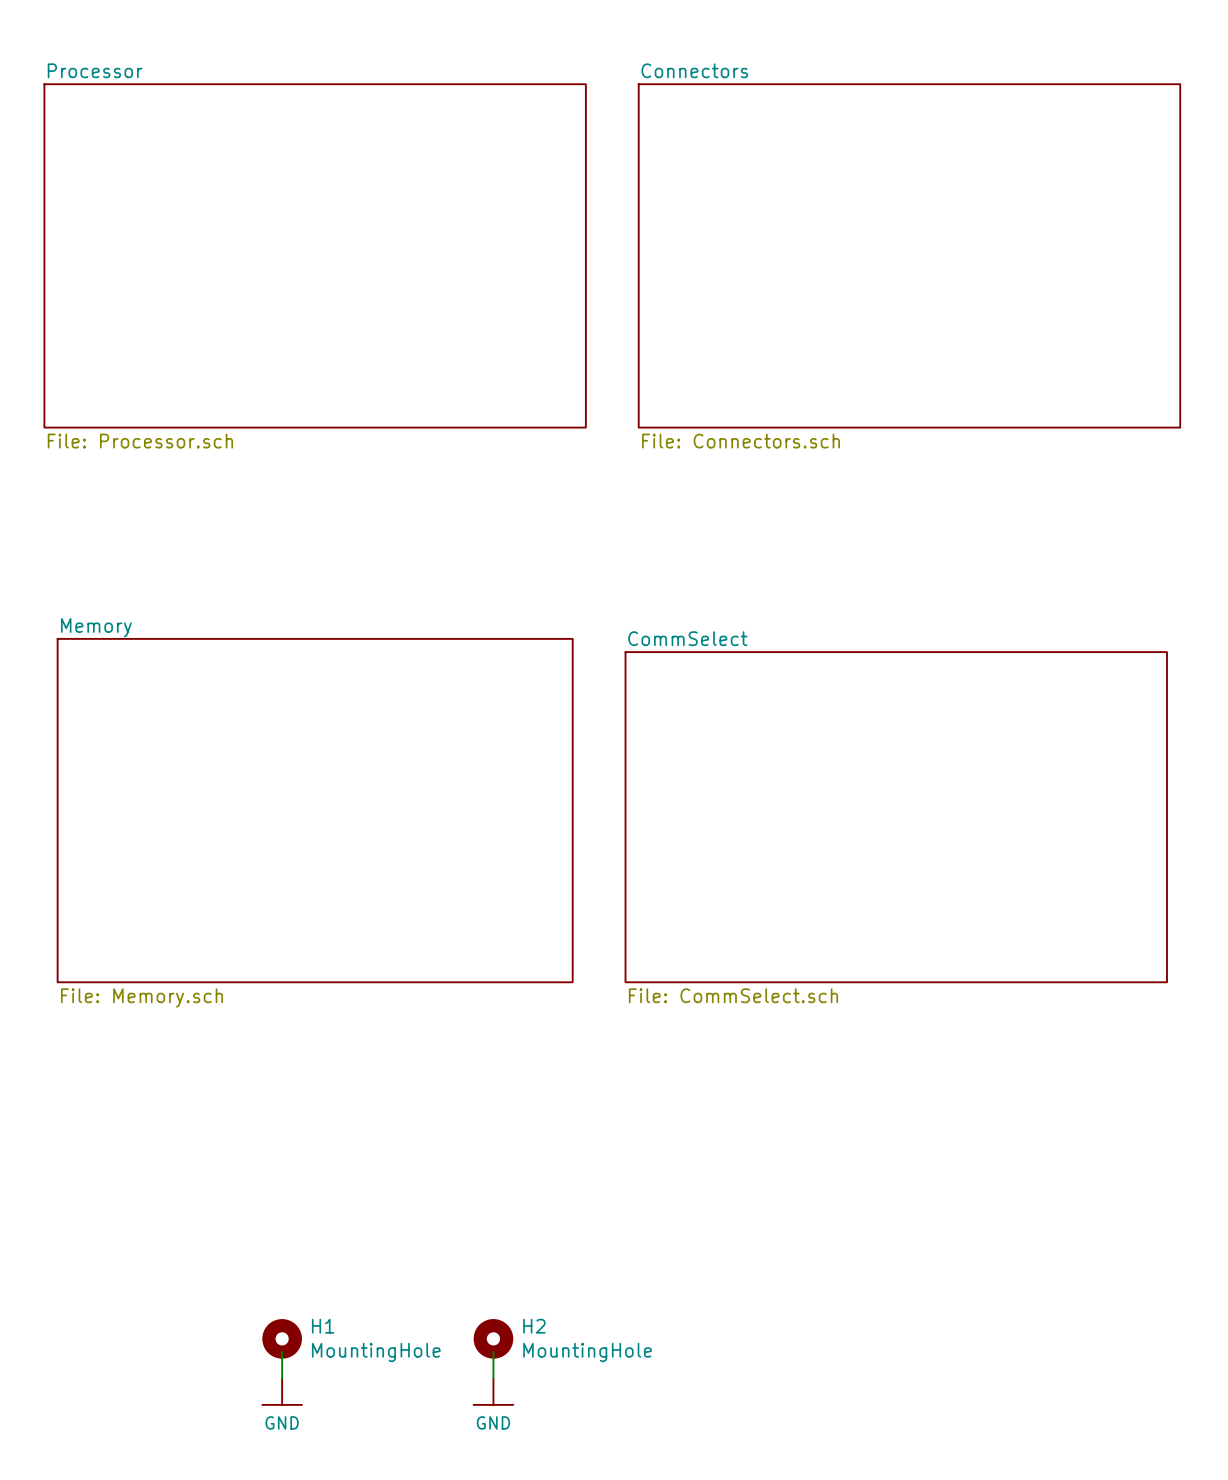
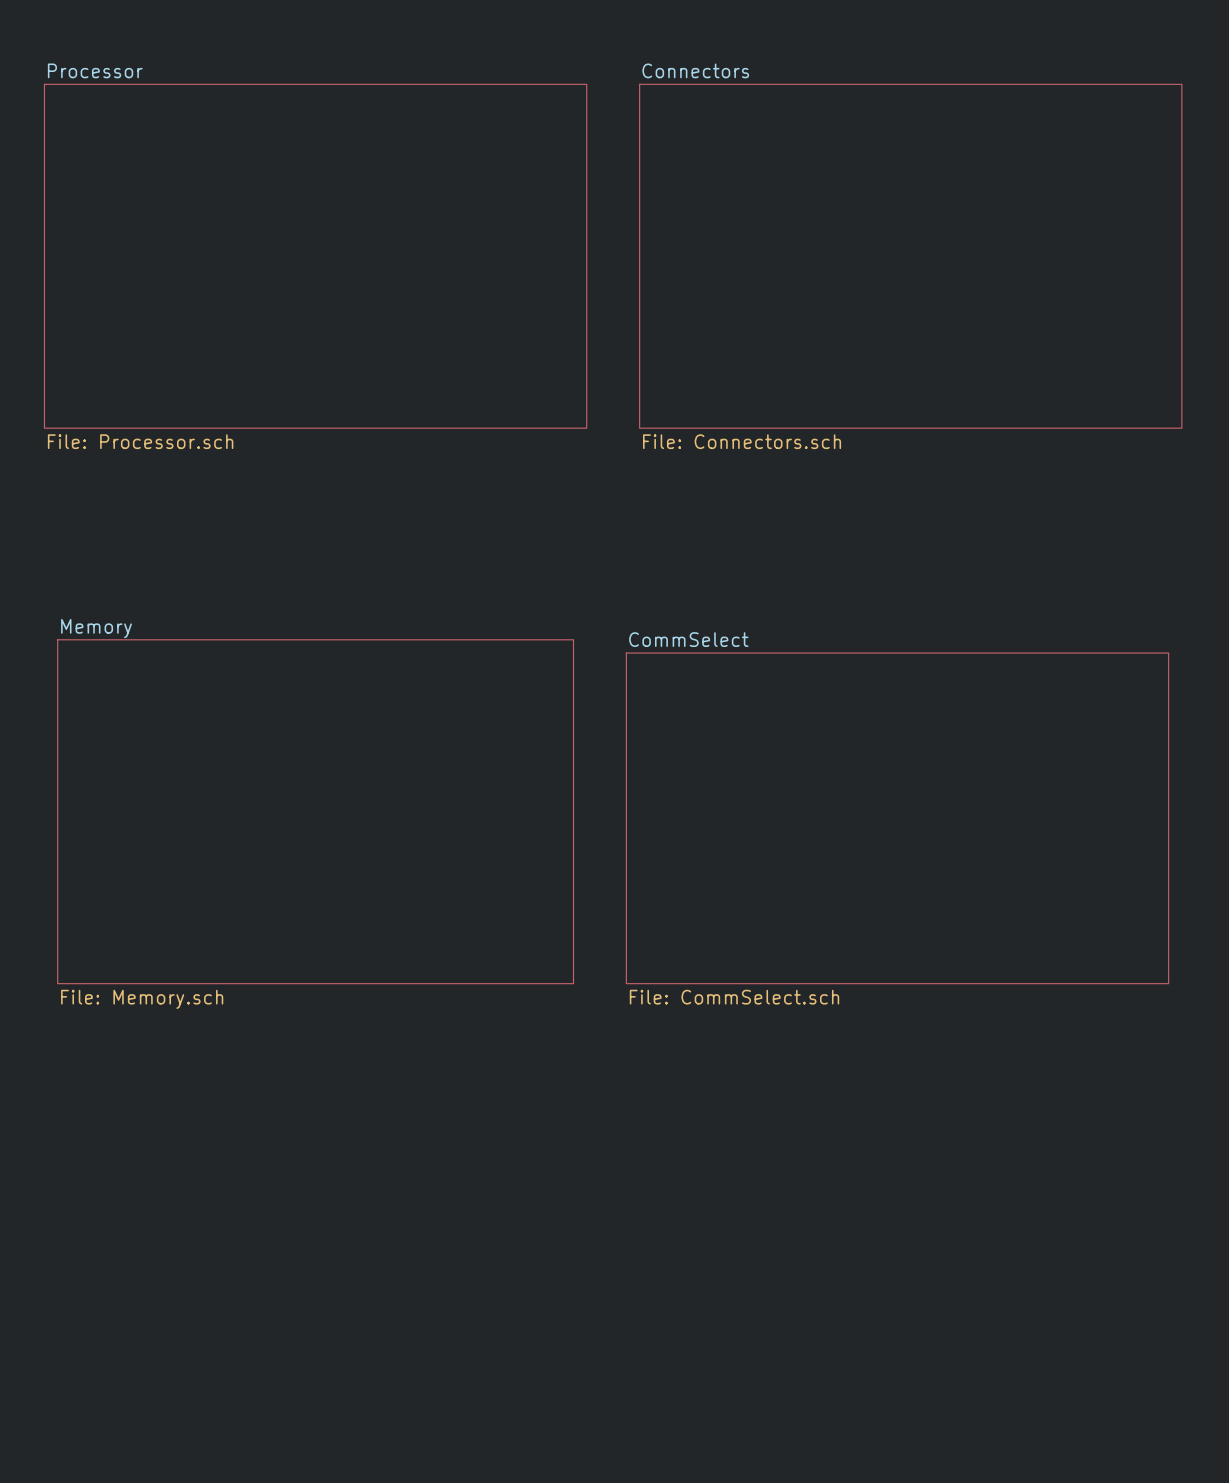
H1: MountingHole (282, 1338) -> none
H2: MountingHole (493, 1338) -> none
wire: (282, 1352) (282, 1378) -> none
wire: (493, 1352) (493, 1378) -> none
power symbol: GND (282, 1391) -> none
power symbol: GND (493, 1391) -> none

